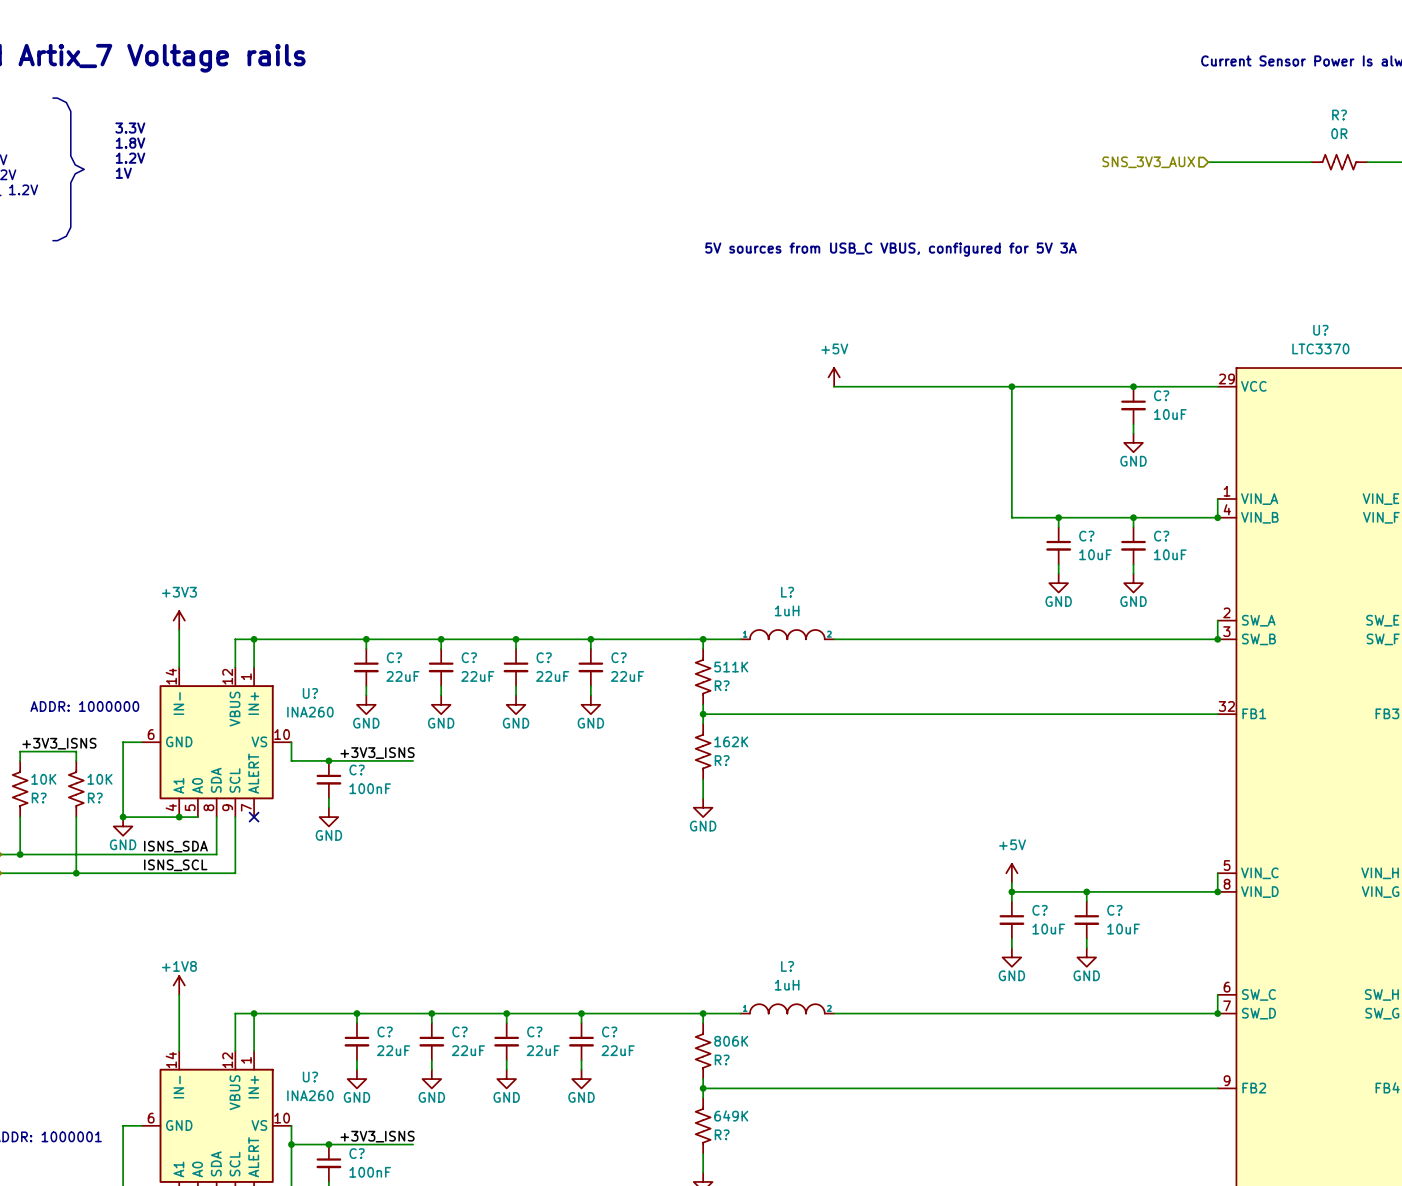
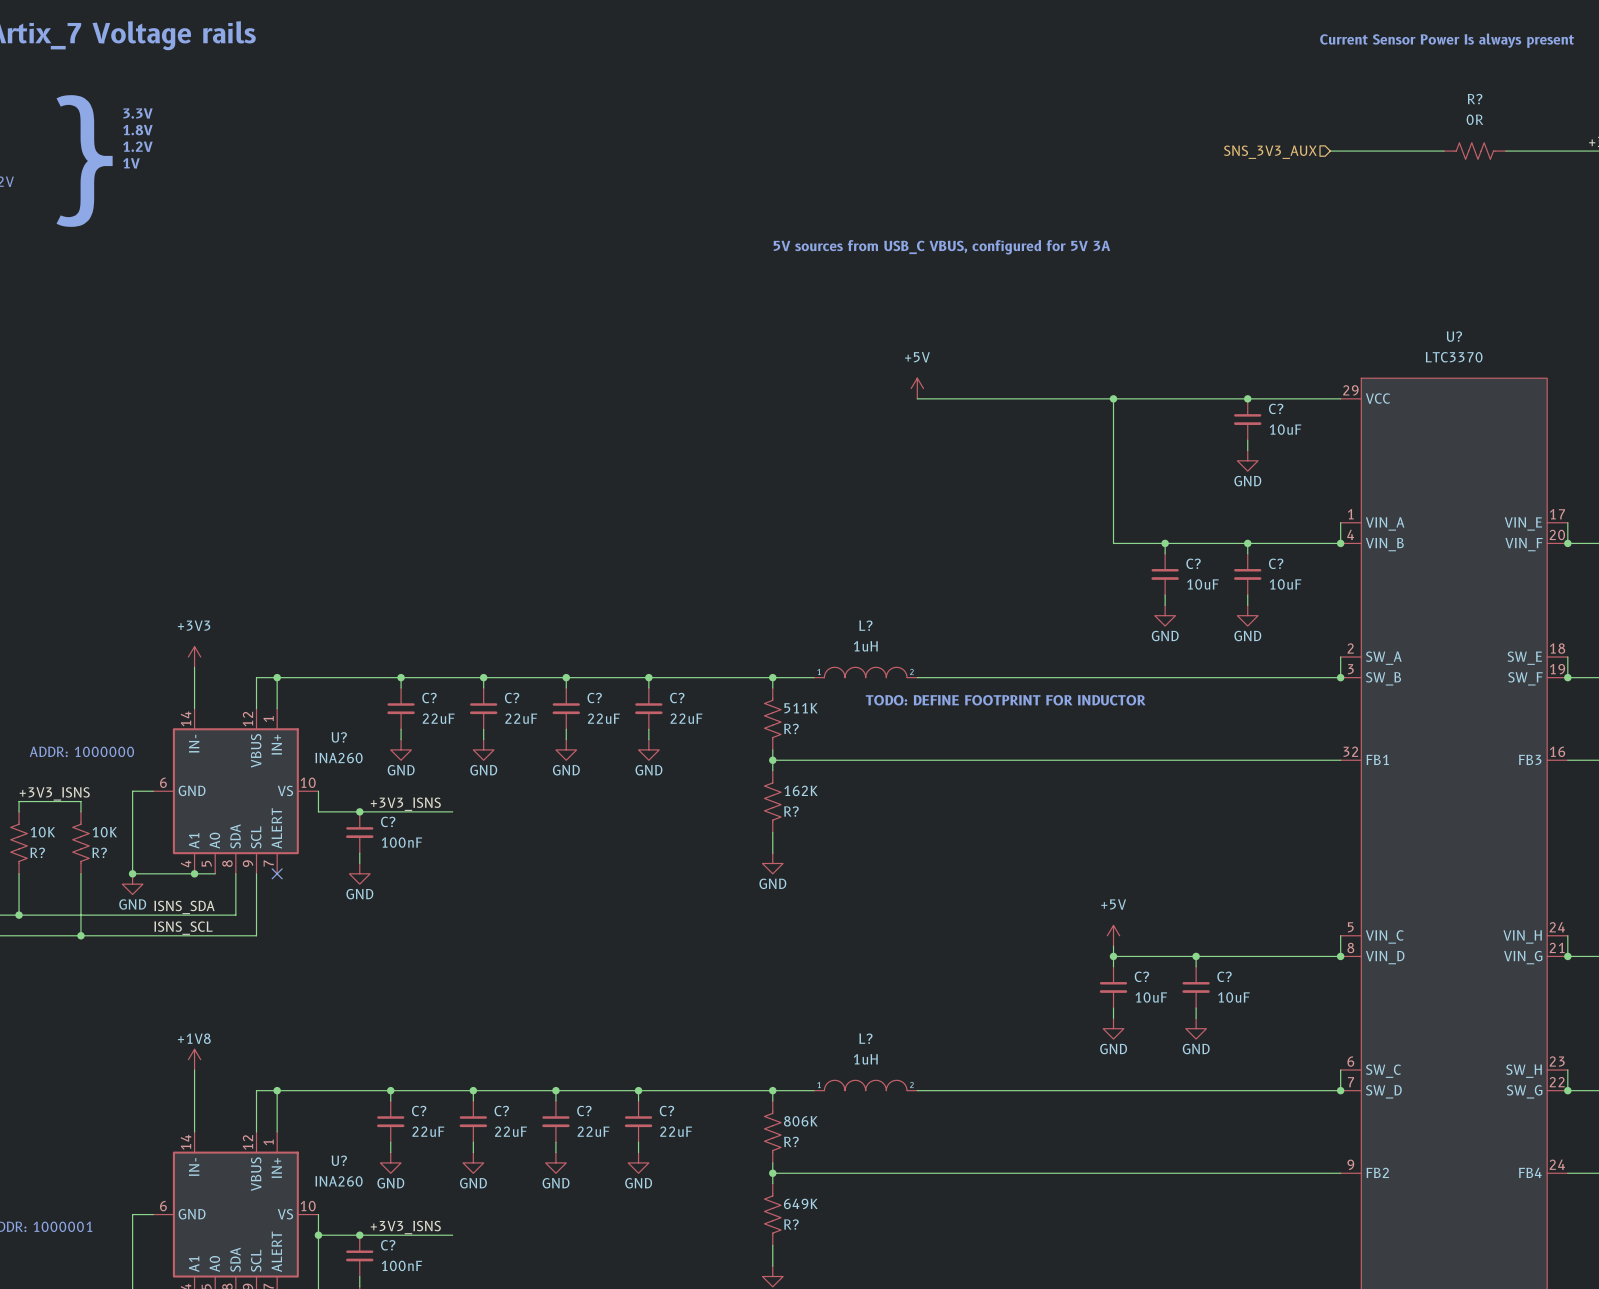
text: none -> TODO: DEFINE FOOTPRINT FOR INDUCTOR (1005, 700)

